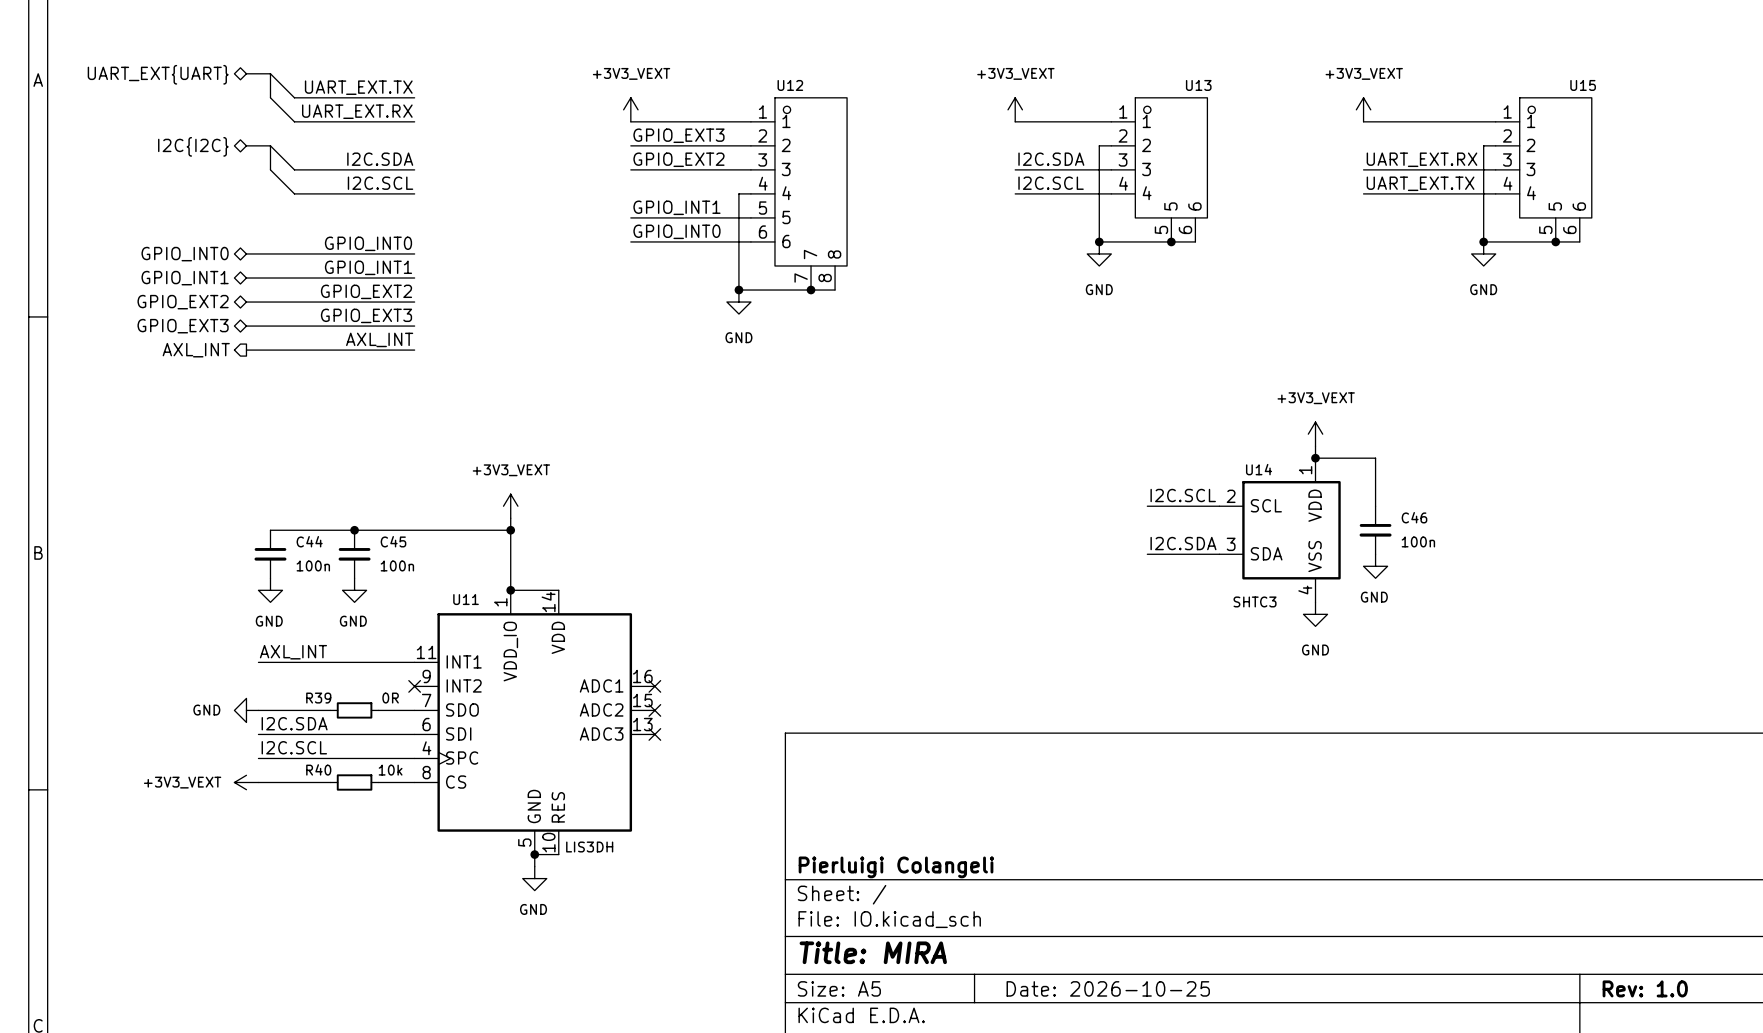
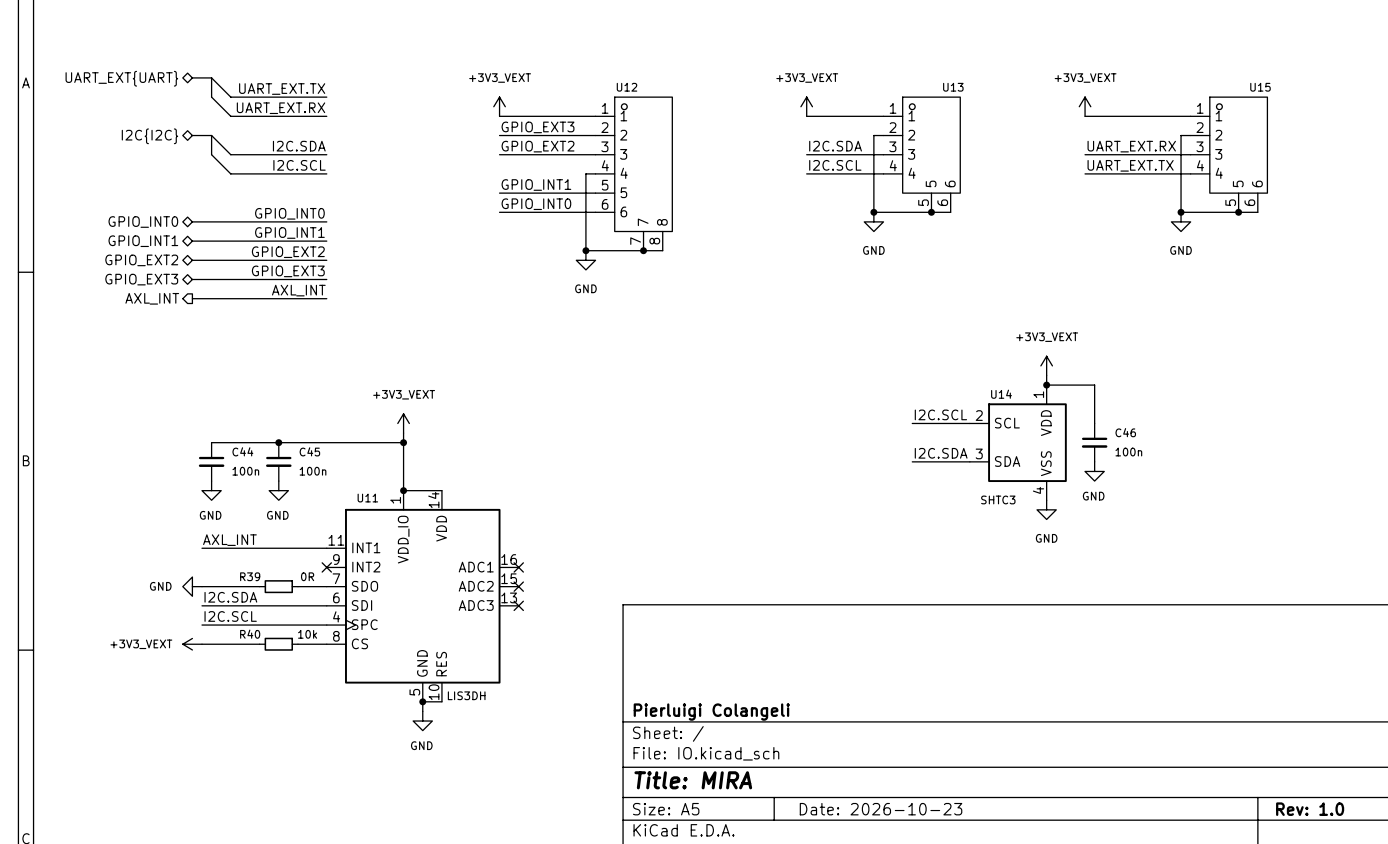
title block: Date: 2026-10-25 (1108, 988) -> Date: 2026-10-23 (881, 809)

